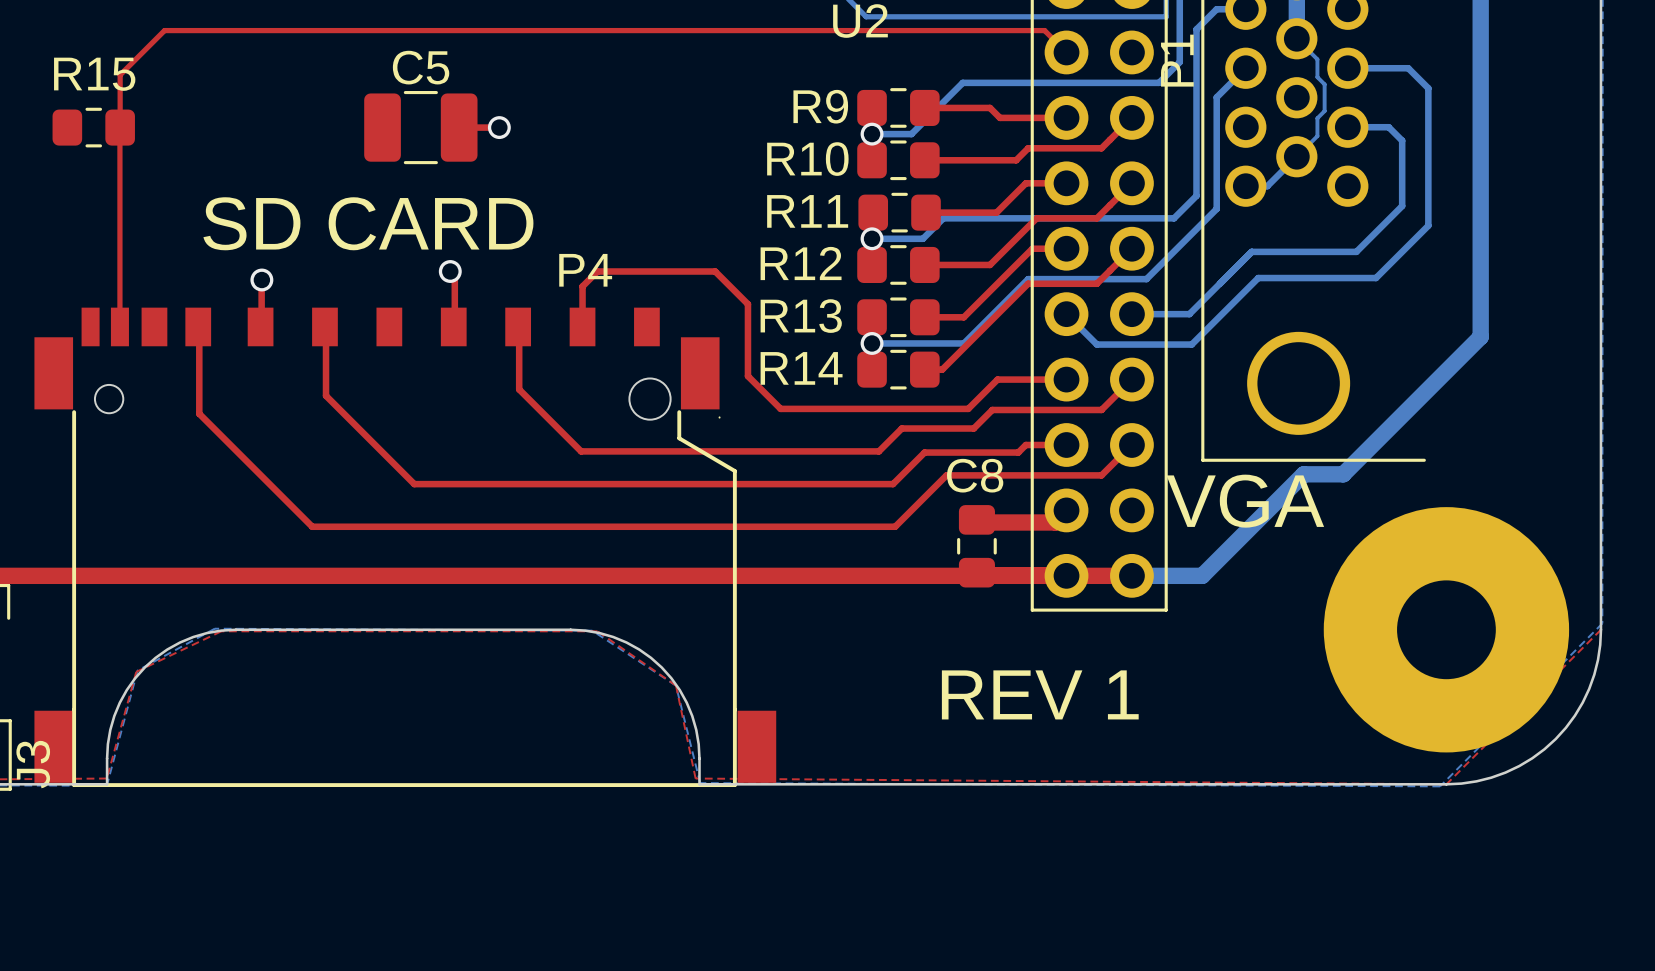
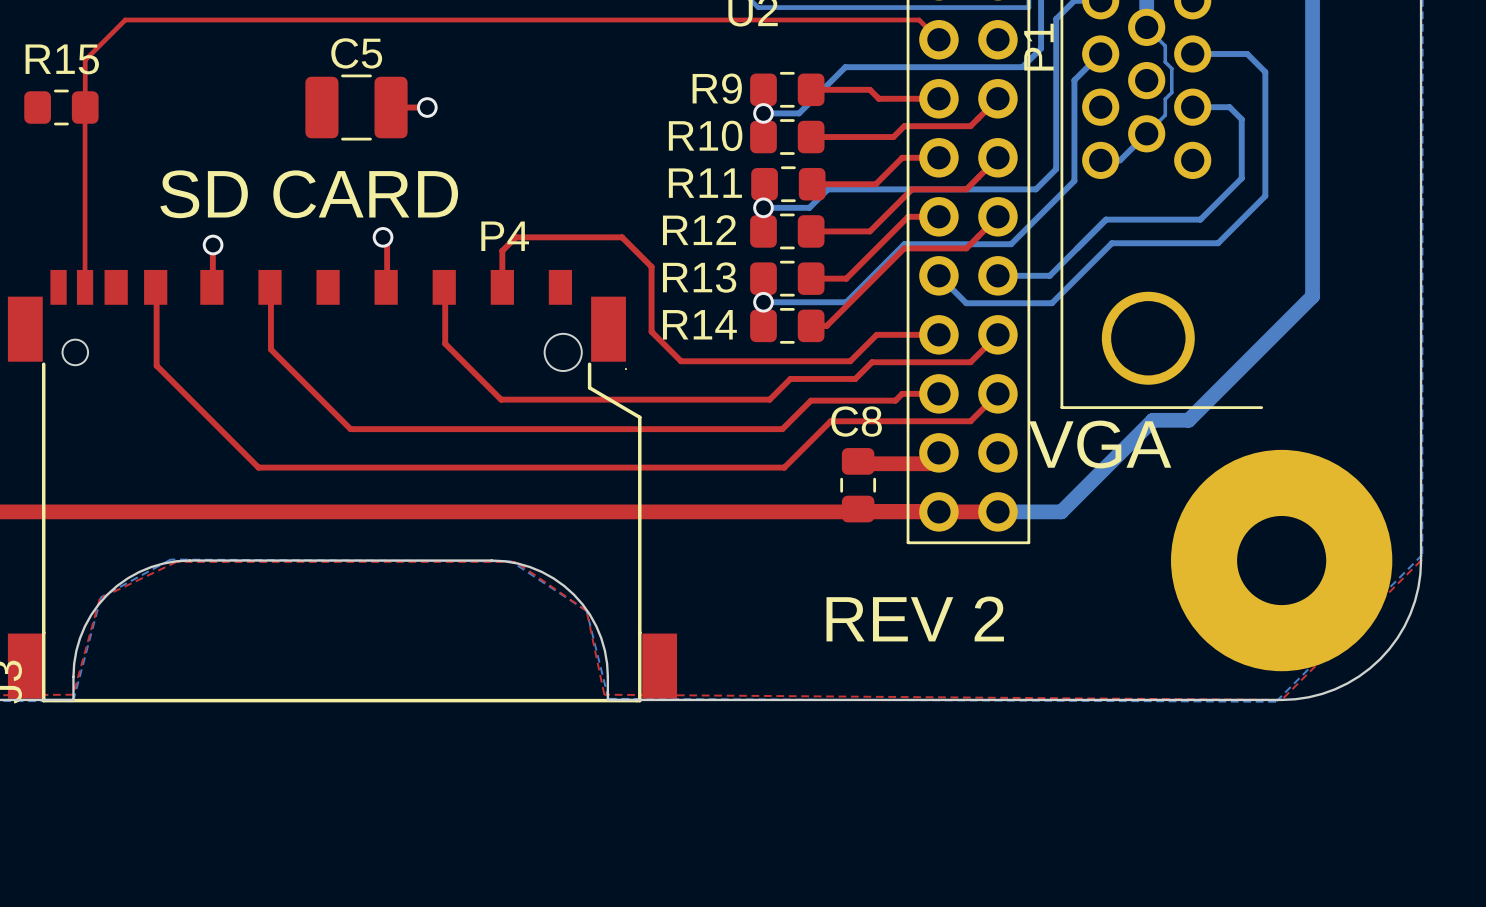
text: REV 1 (1040, 694) -> REV 2 (915, 618)

